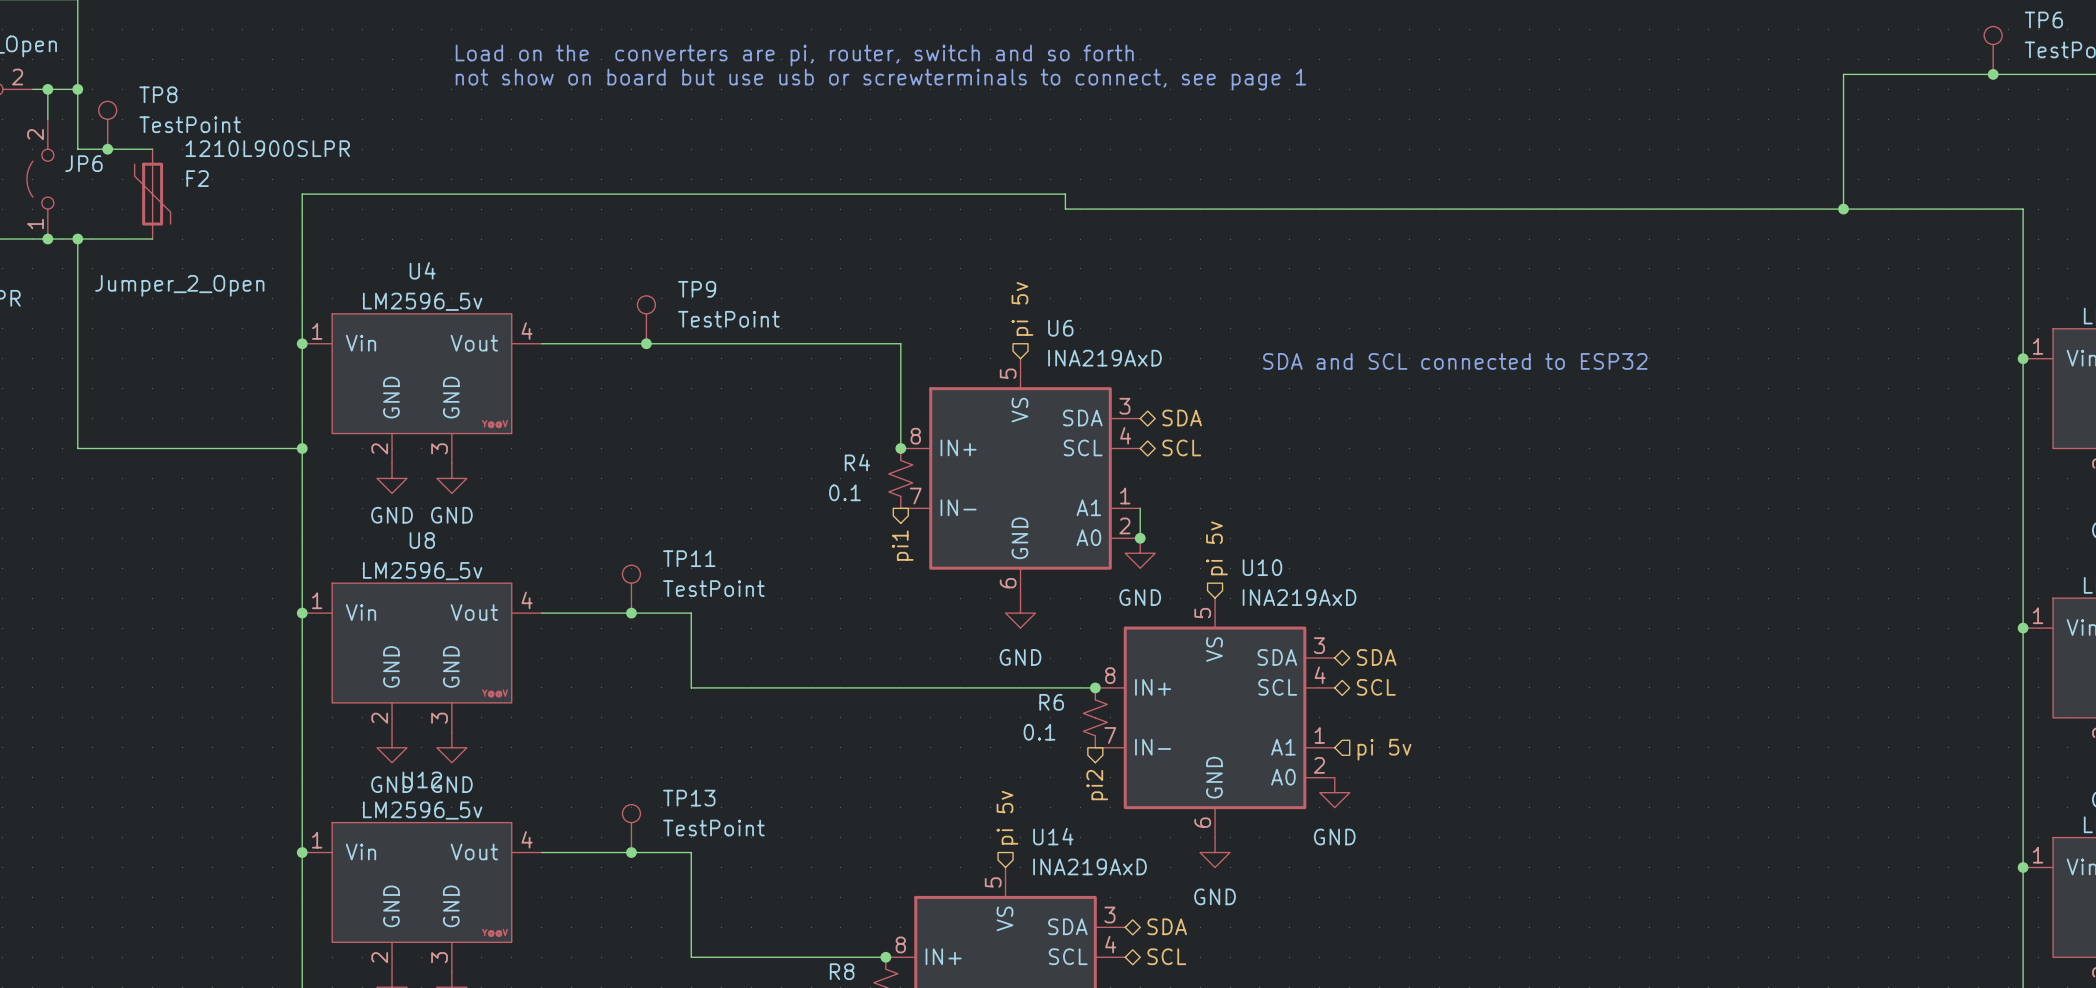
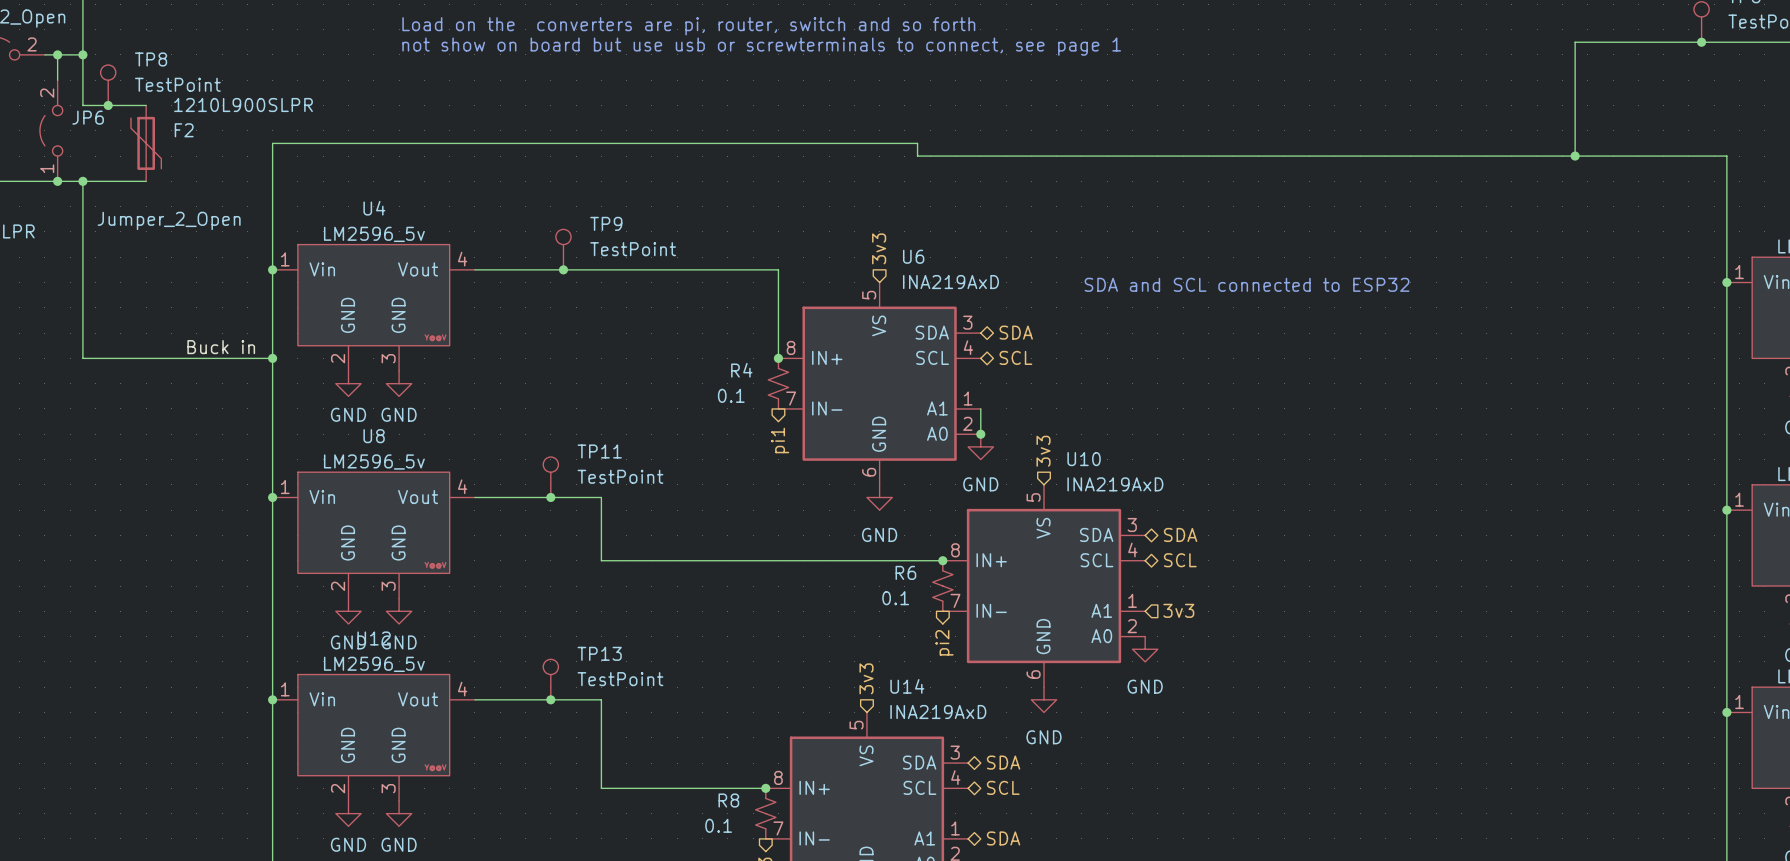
hierarchical label: pi 5v (1022, 308) -> 3v3 (879, 248)
label: none -> Buck in (221, 347)
hierarchical label: pi 5v (1216, 548) -> 3v3 (1043, 451)
hierarchical label: pi 5v (1384, 749) -> 3v3 (1178, 610)
hierarchical label: pi 5v (1007, 817) -> 3v3 (866, 678)

